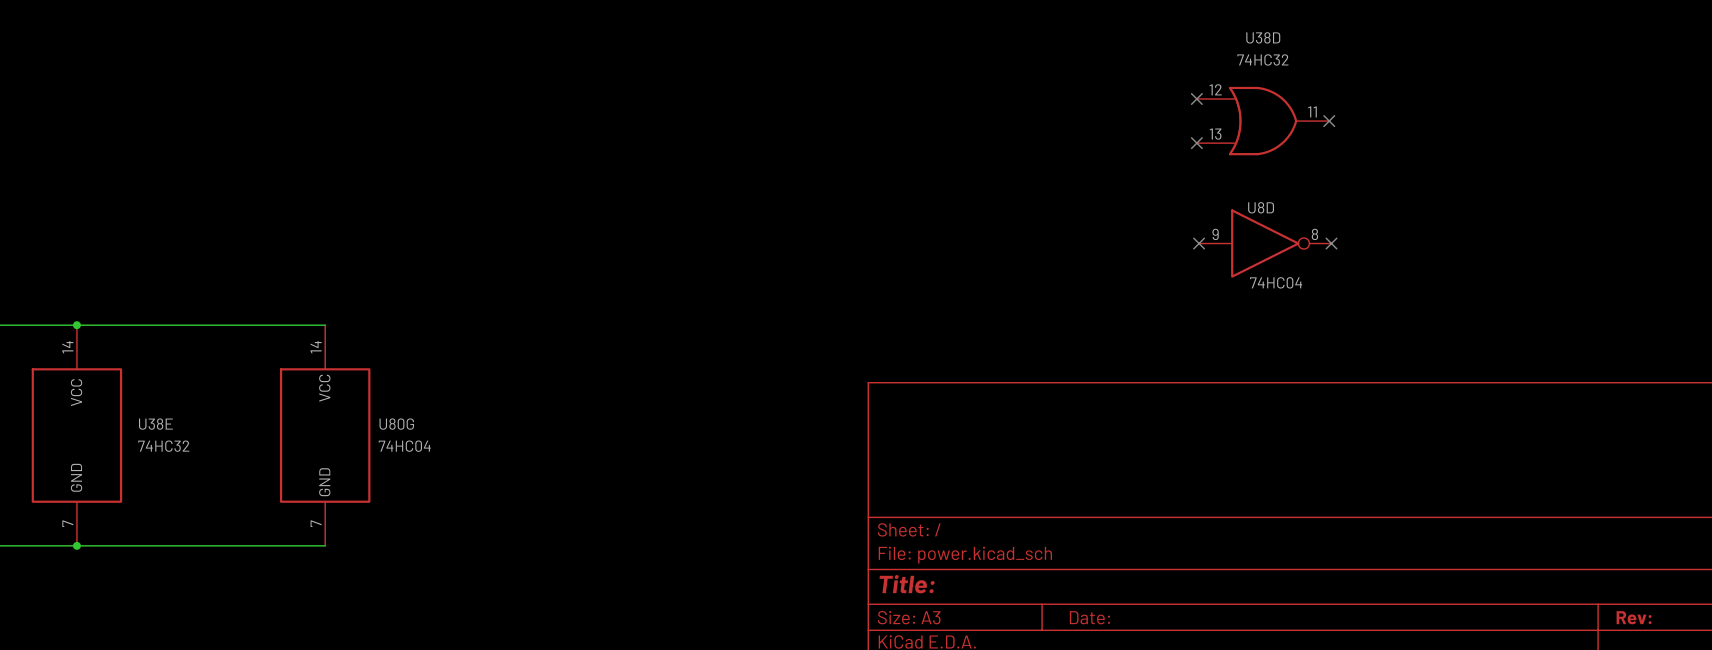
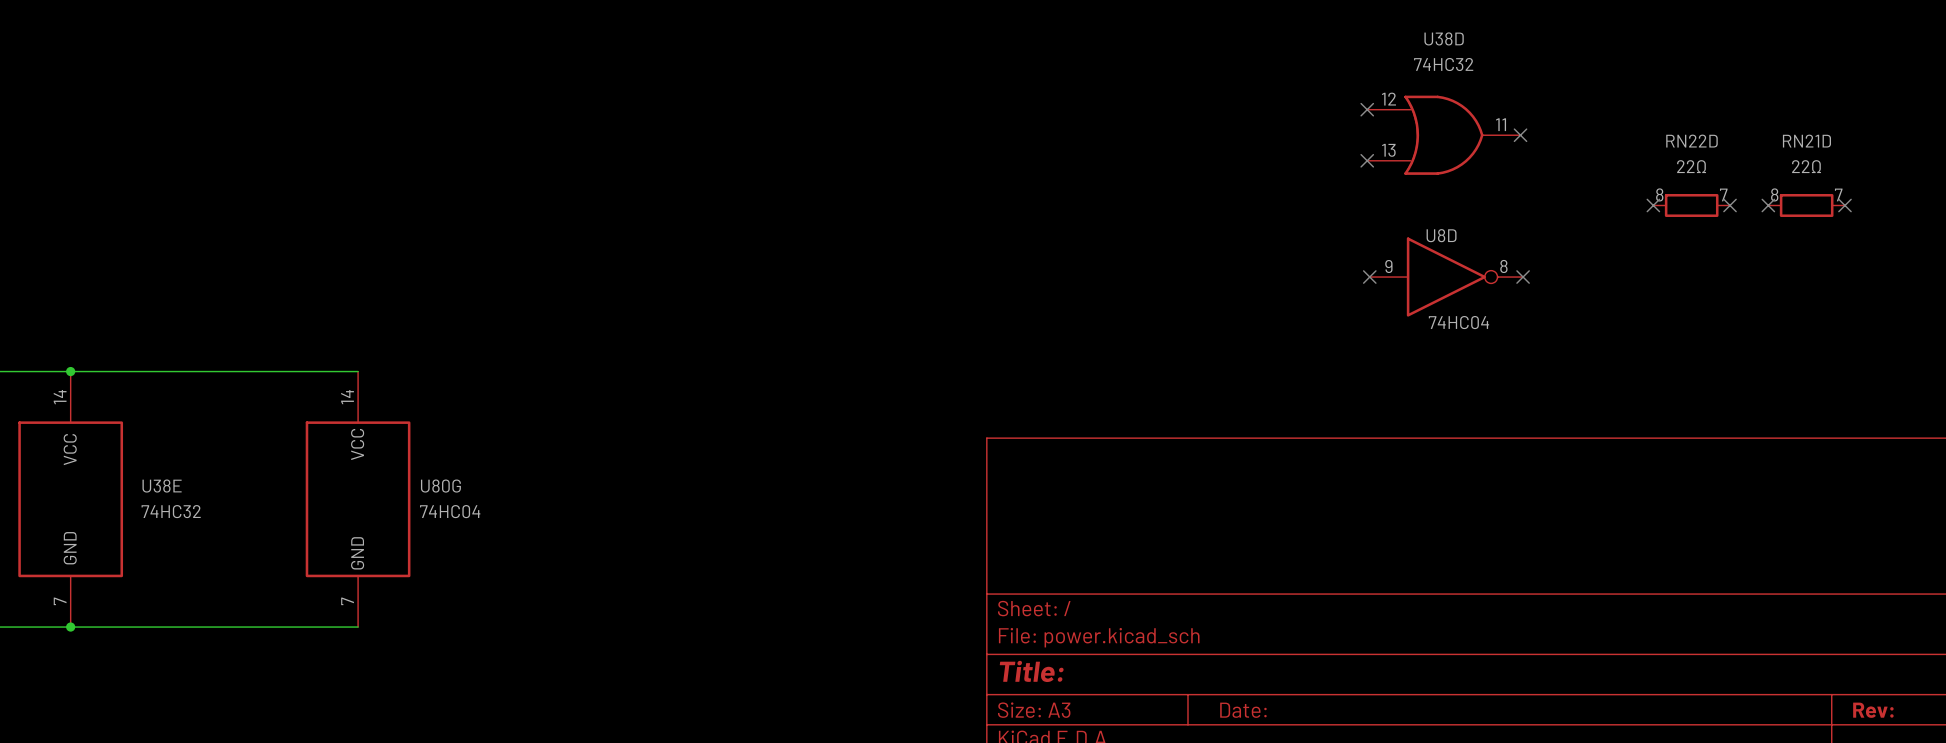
no-connect mark: none -> (1653, 205)
RN22D: none -> 22Ω (1691, 205)
no-connect mark: none -> (1730, 205)
no-connect mark: none -> (1768, 205)
RN21D: none -> 22Ω (1806, 205)
no-connect mark: none -> (1844, 205)

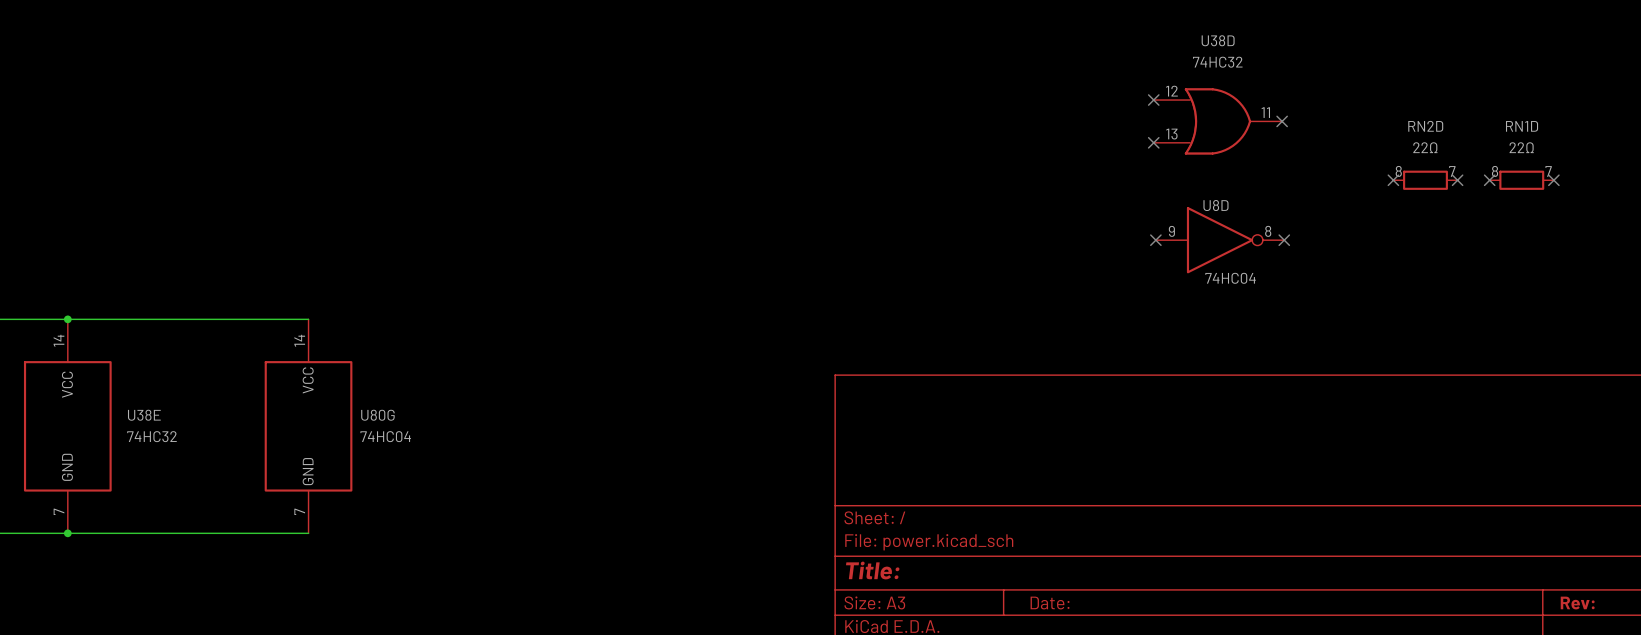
RN22D name: RN22D (1691, 141) -> RN2D (1425, 126)
RN21D name: RN21D (1806, 141) -> RN1D (1522, 126)

